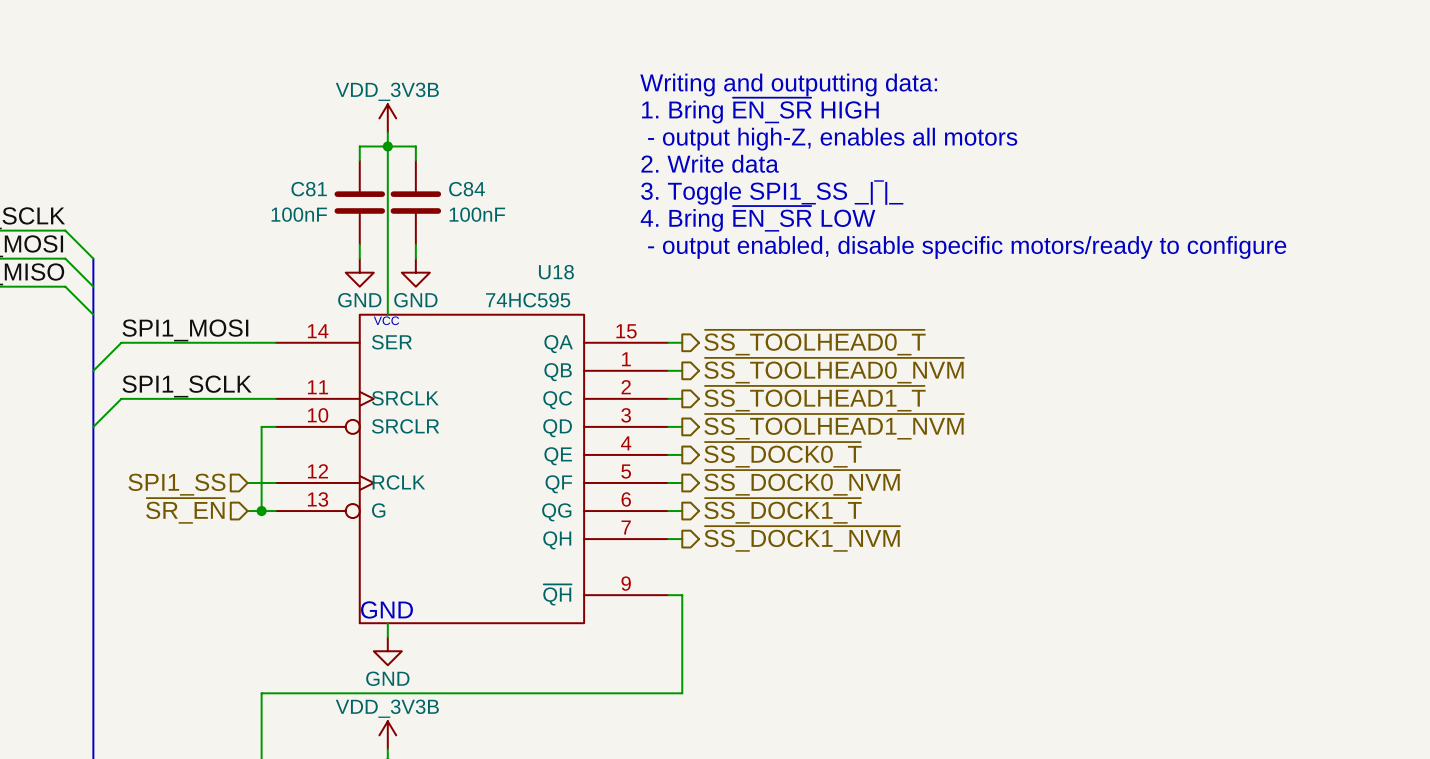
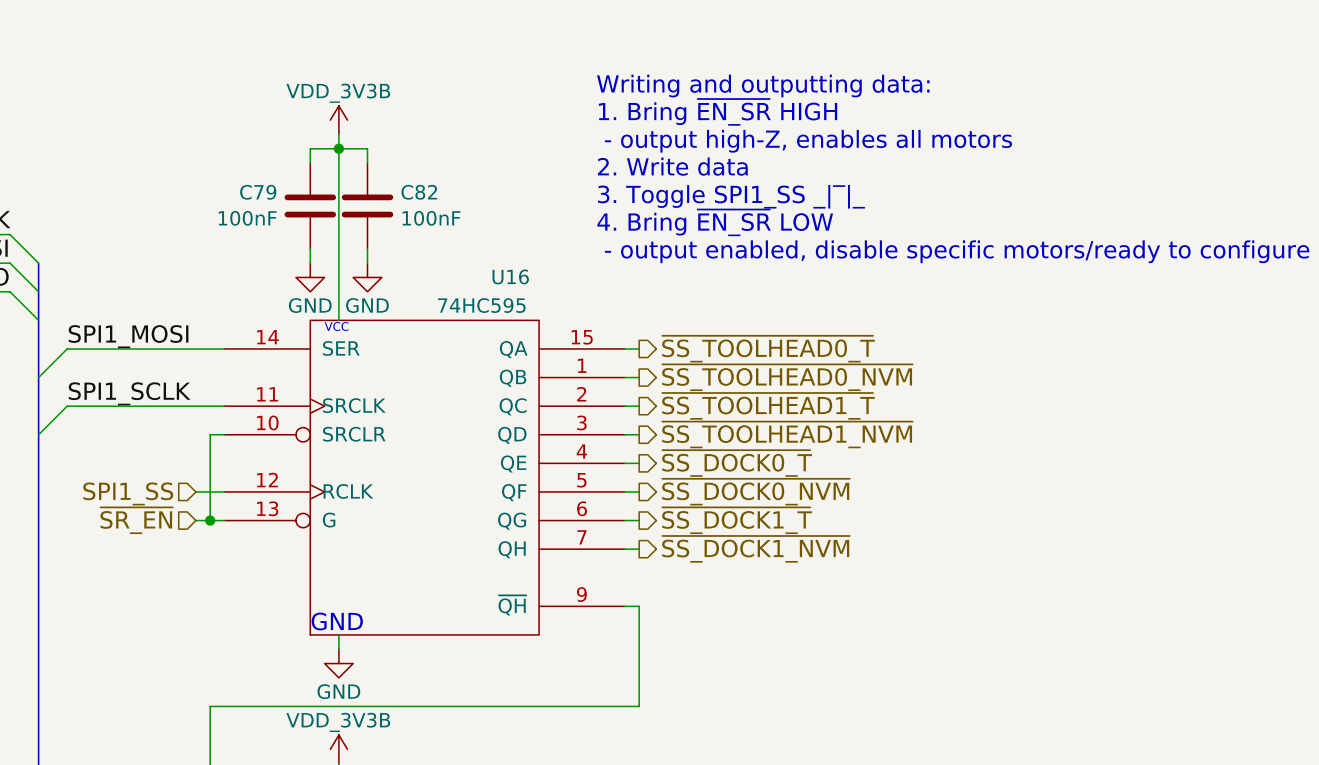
C81 name: C81 (309, 189) -> C79 (258, 192)
C84 name: C84 (467, 189) -> C82 (419, 192)
U18 name: U18 (556, 272) -> U16 (510, 276)

